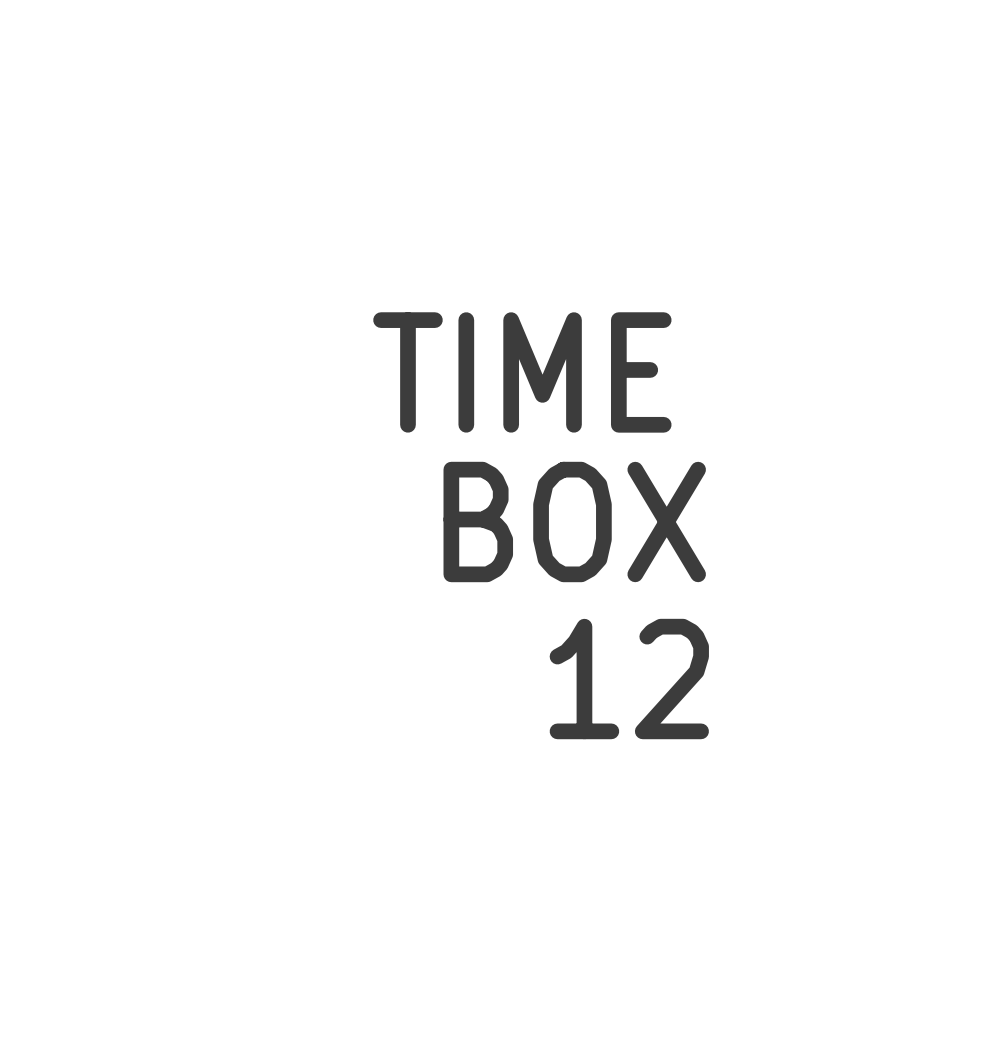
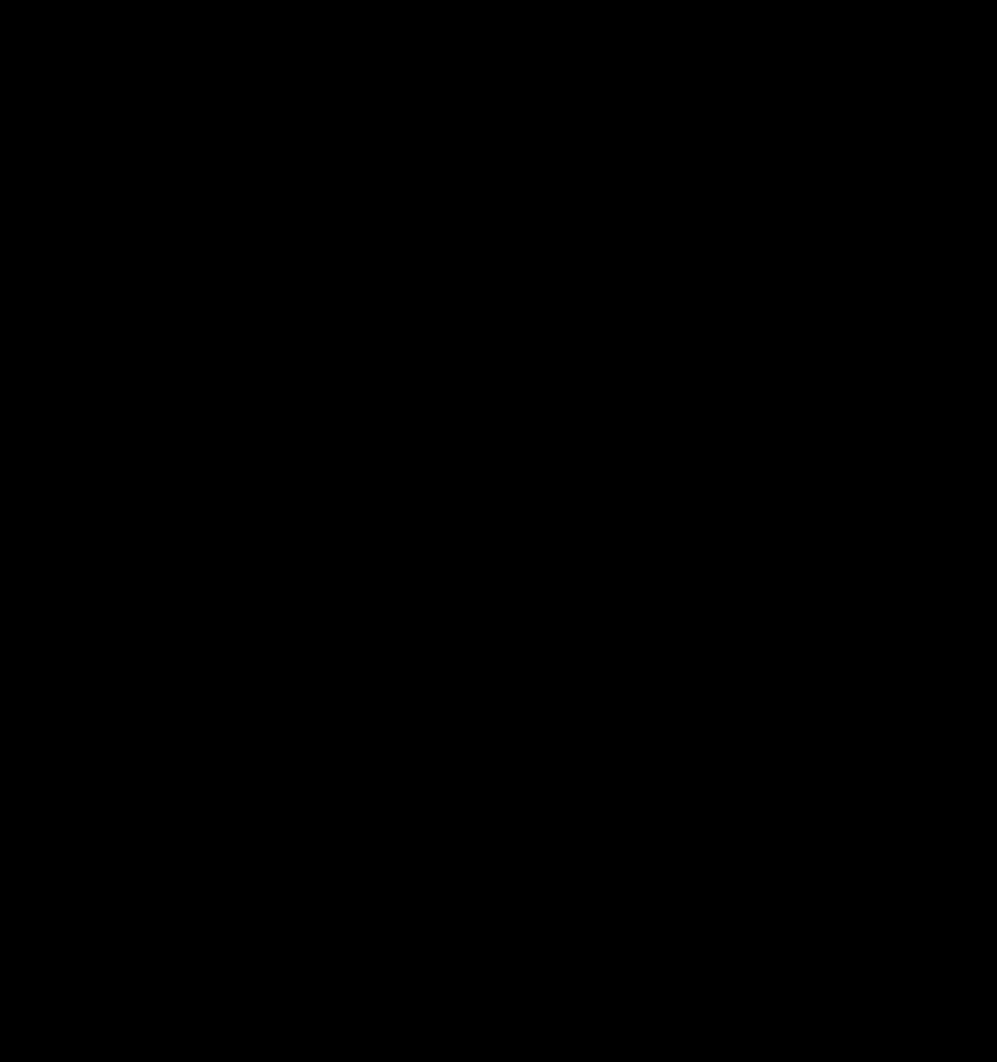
text: TIME (522, 372) -> none
text: BOX (574, 522) -> none
text: 12 (629, 679) -> none

